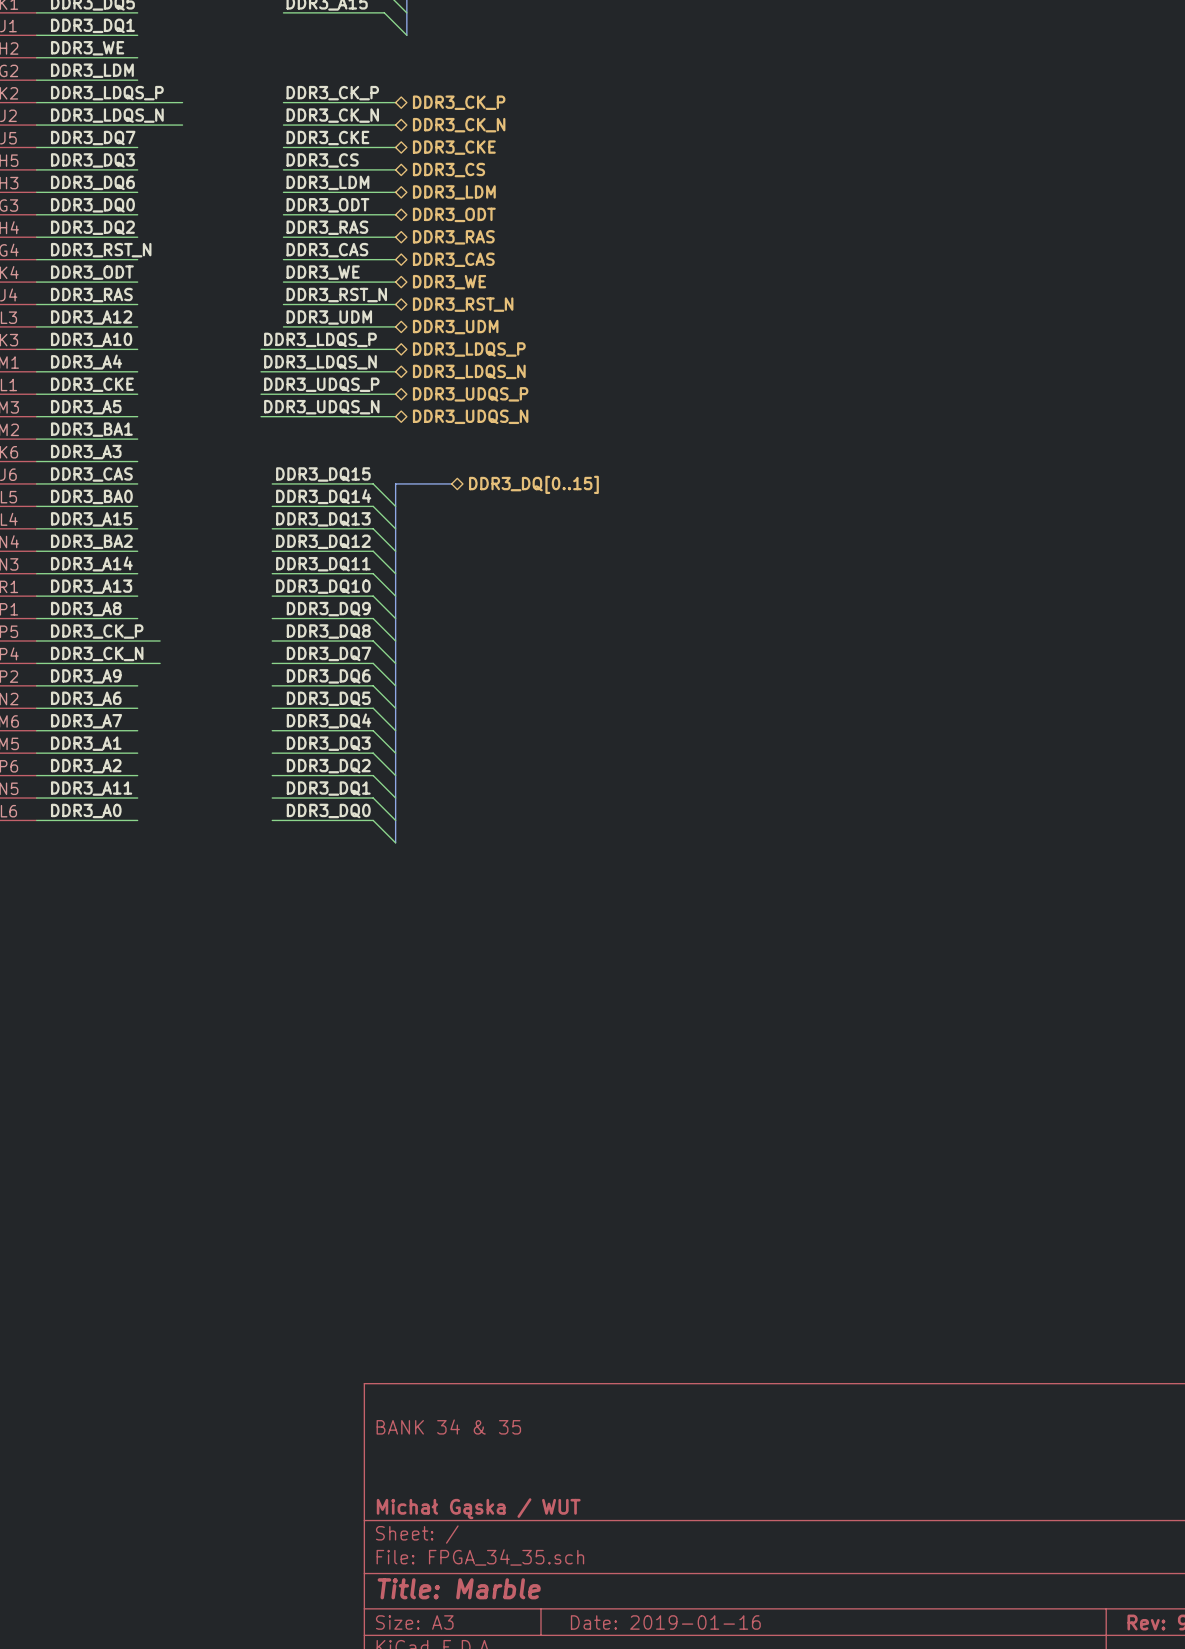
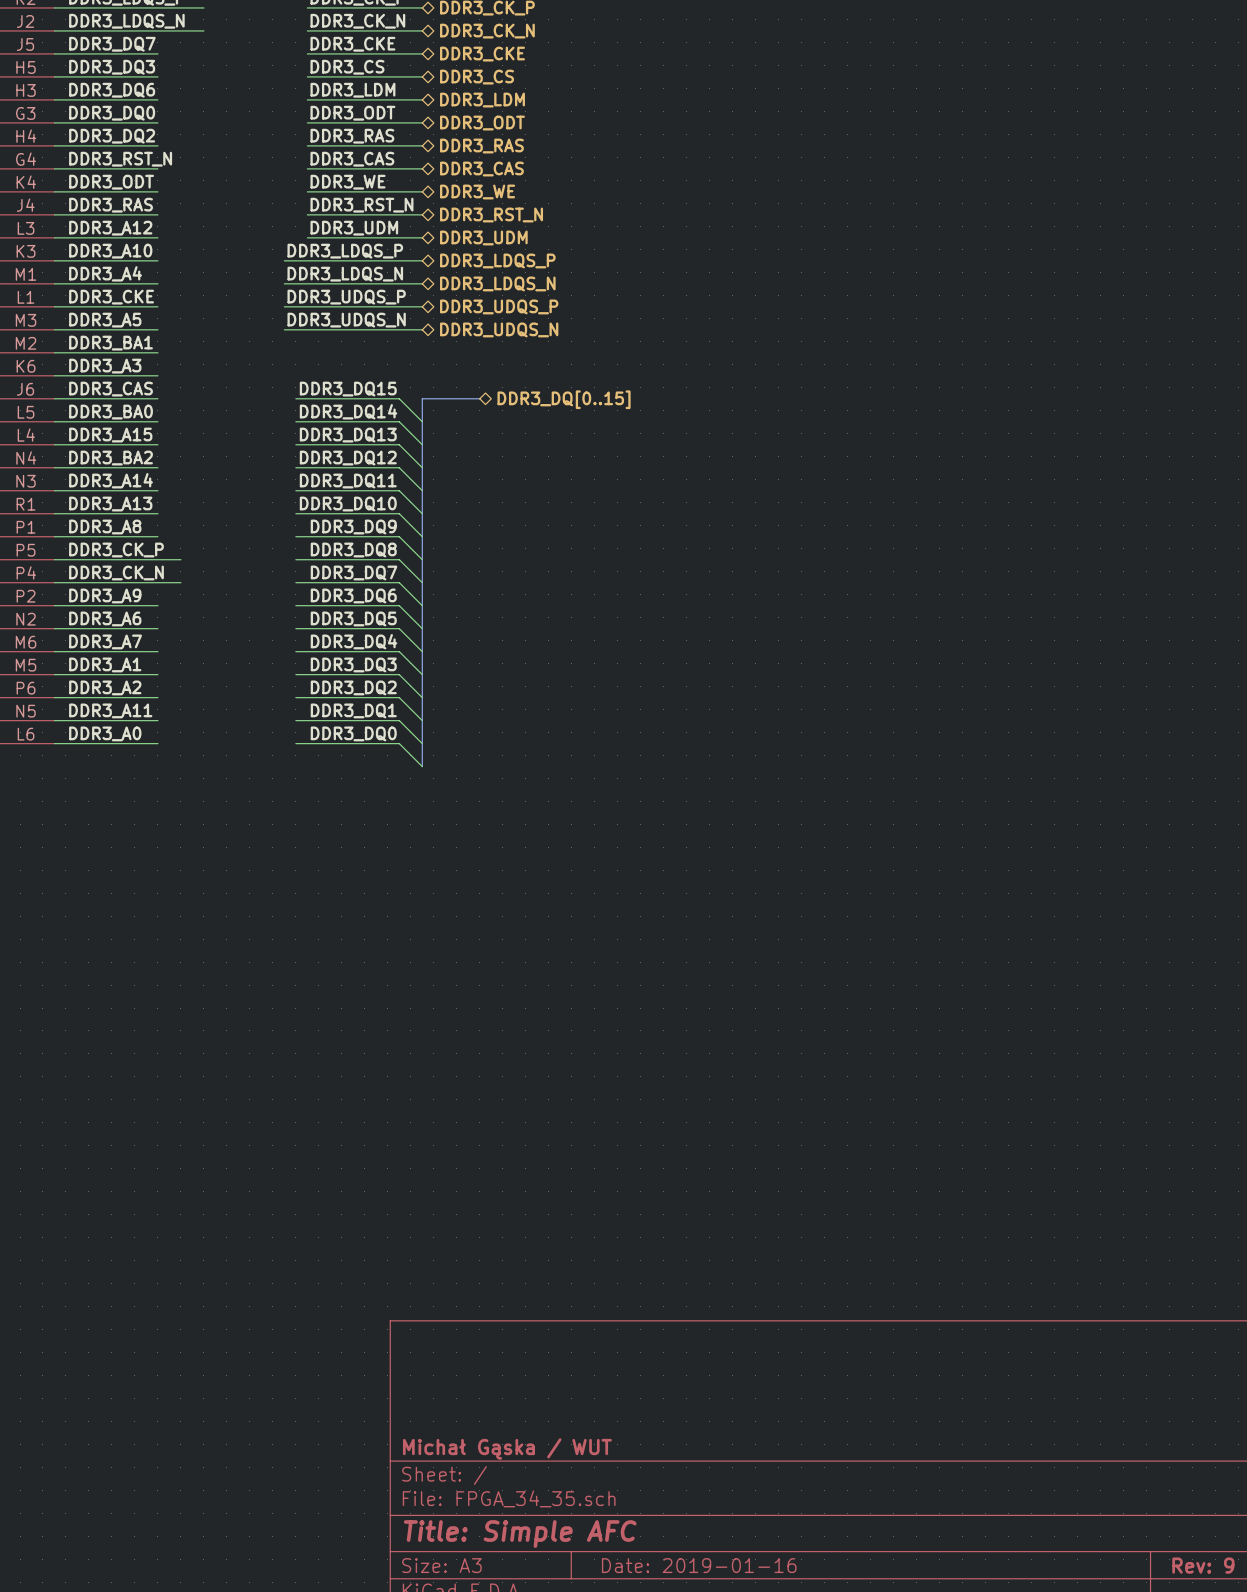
title block: BANK 34 & 35 (448, 1427) -> none
title block: Title: Marble (459, 1588) -> Title: Simple AFC (520, 1534)

